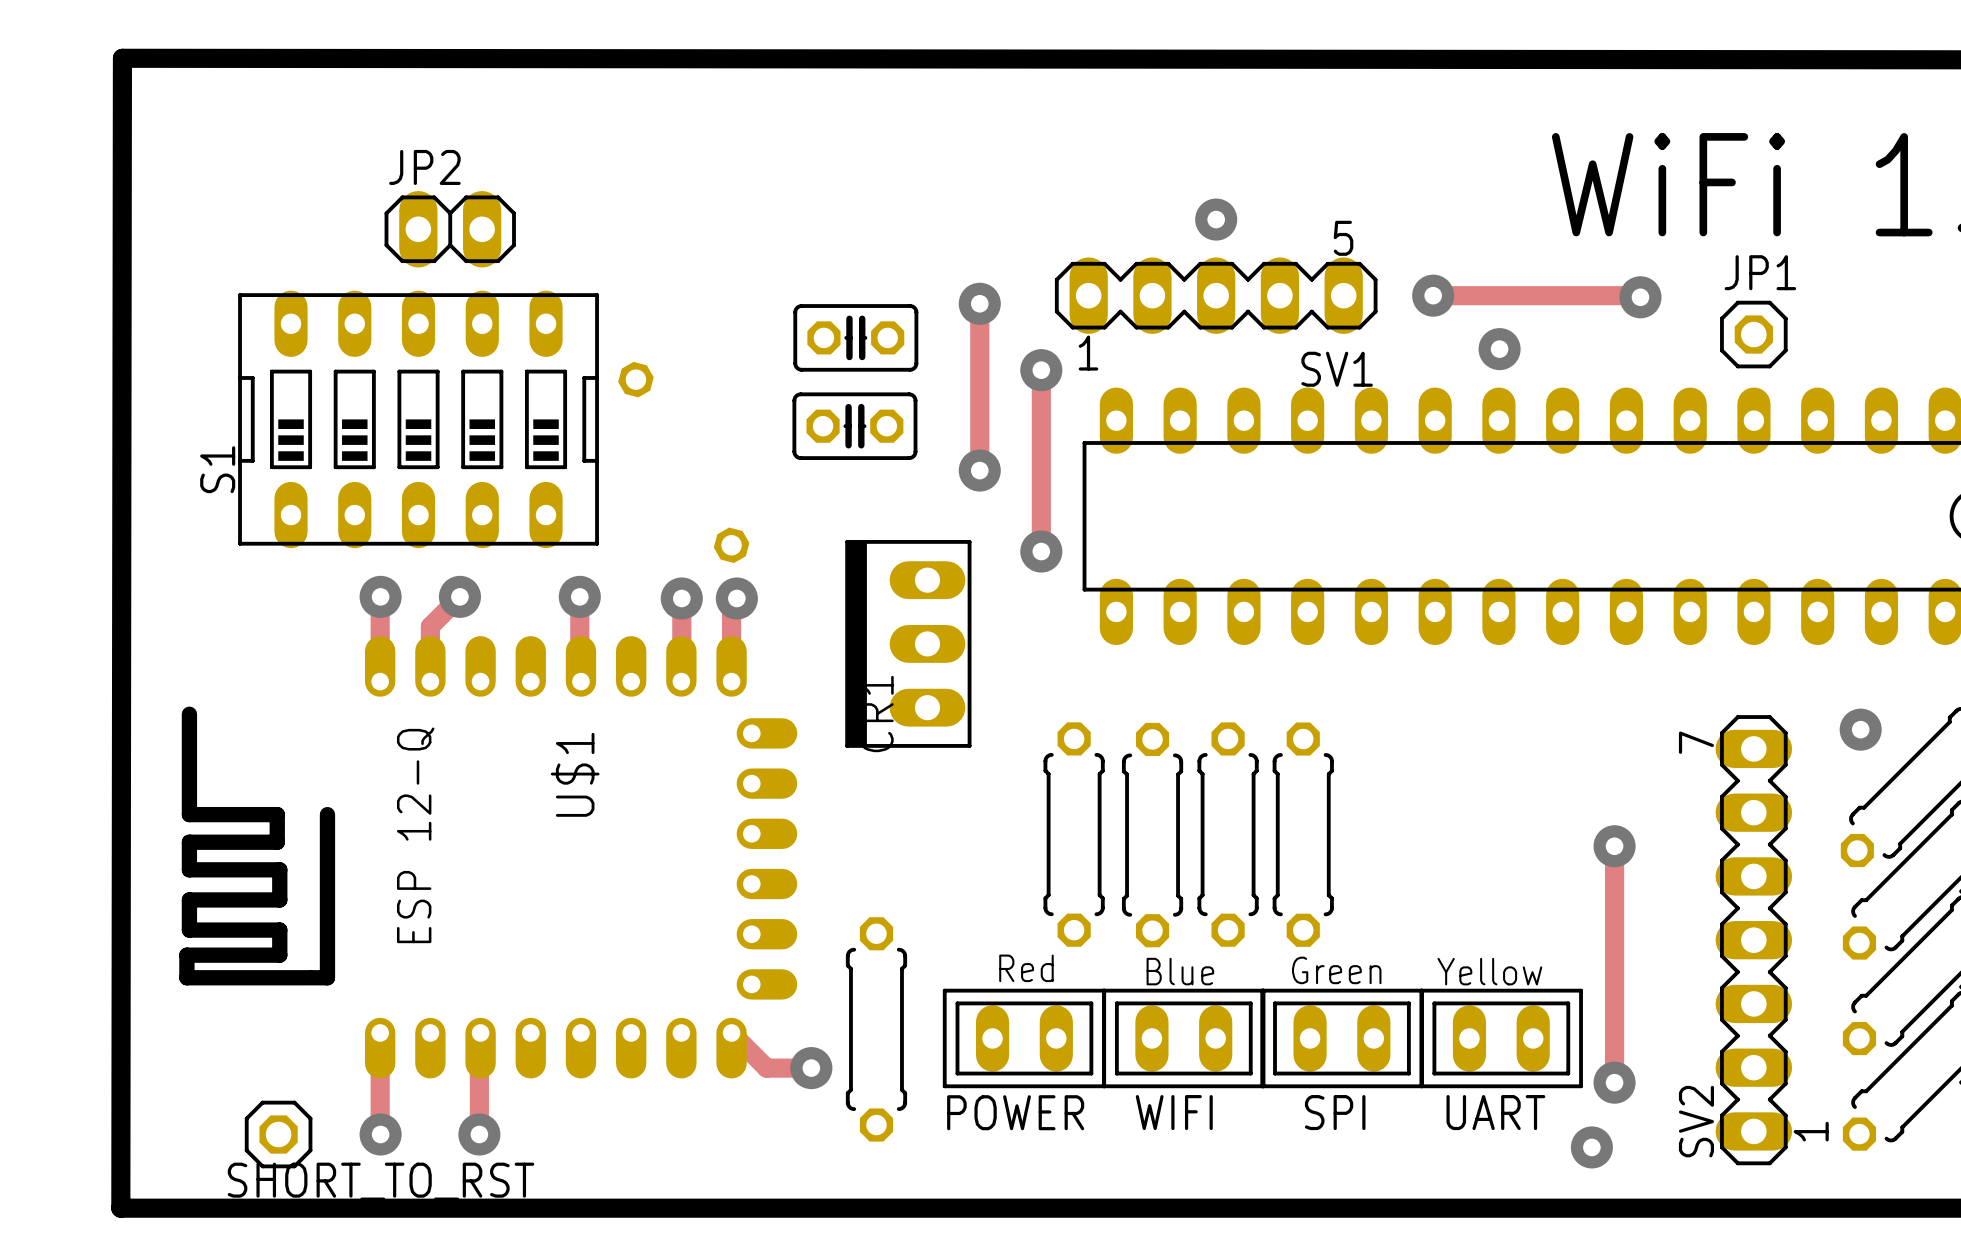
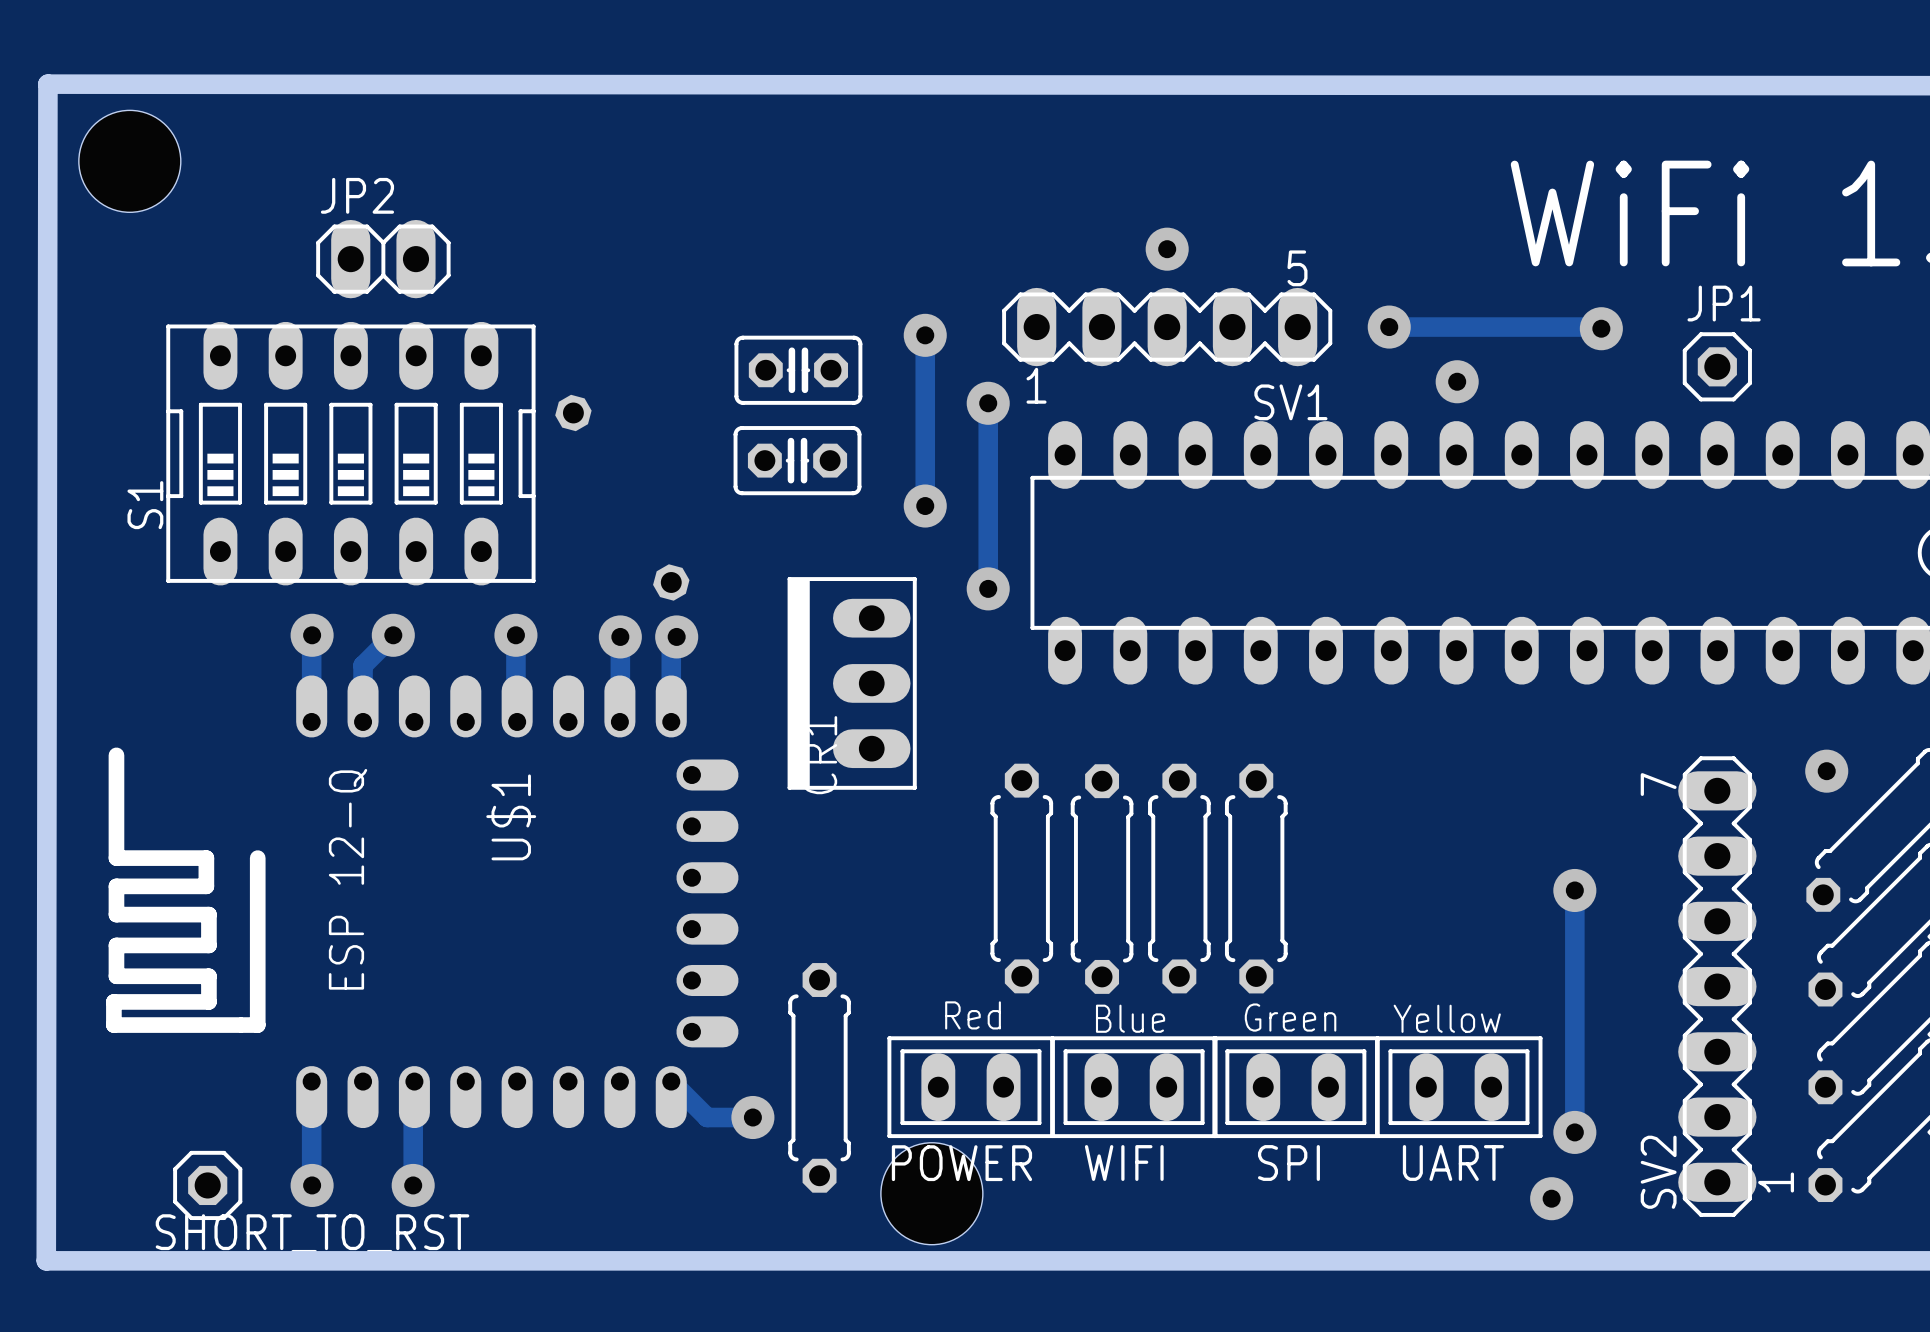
hole: none -> (129, 161)
hole: none -> (931, 1193)

